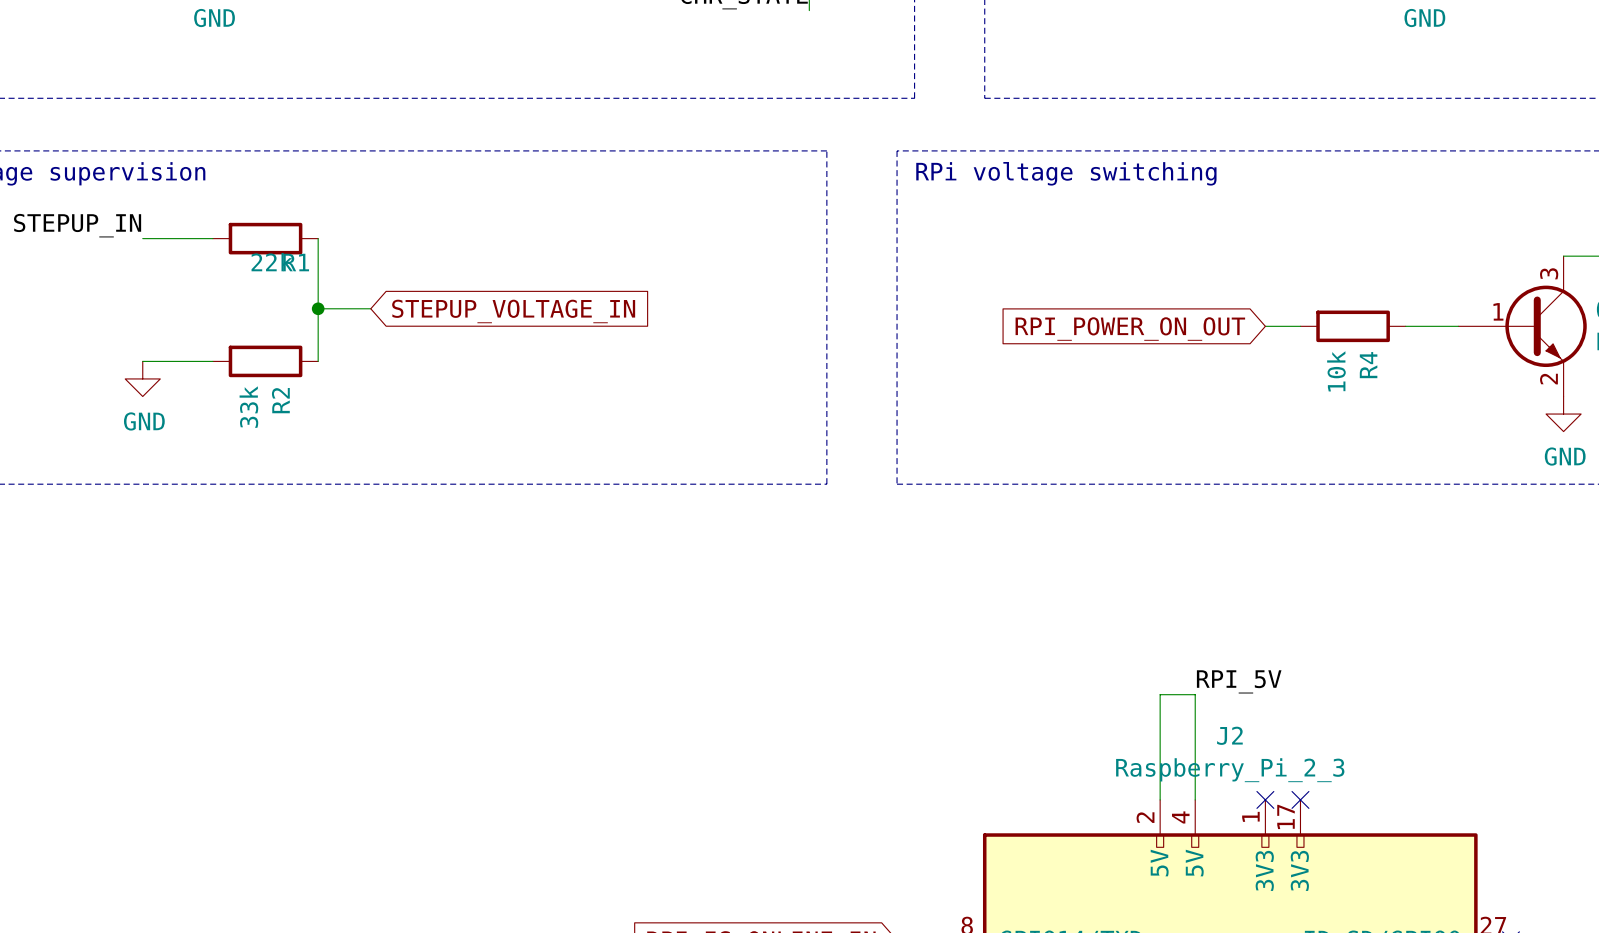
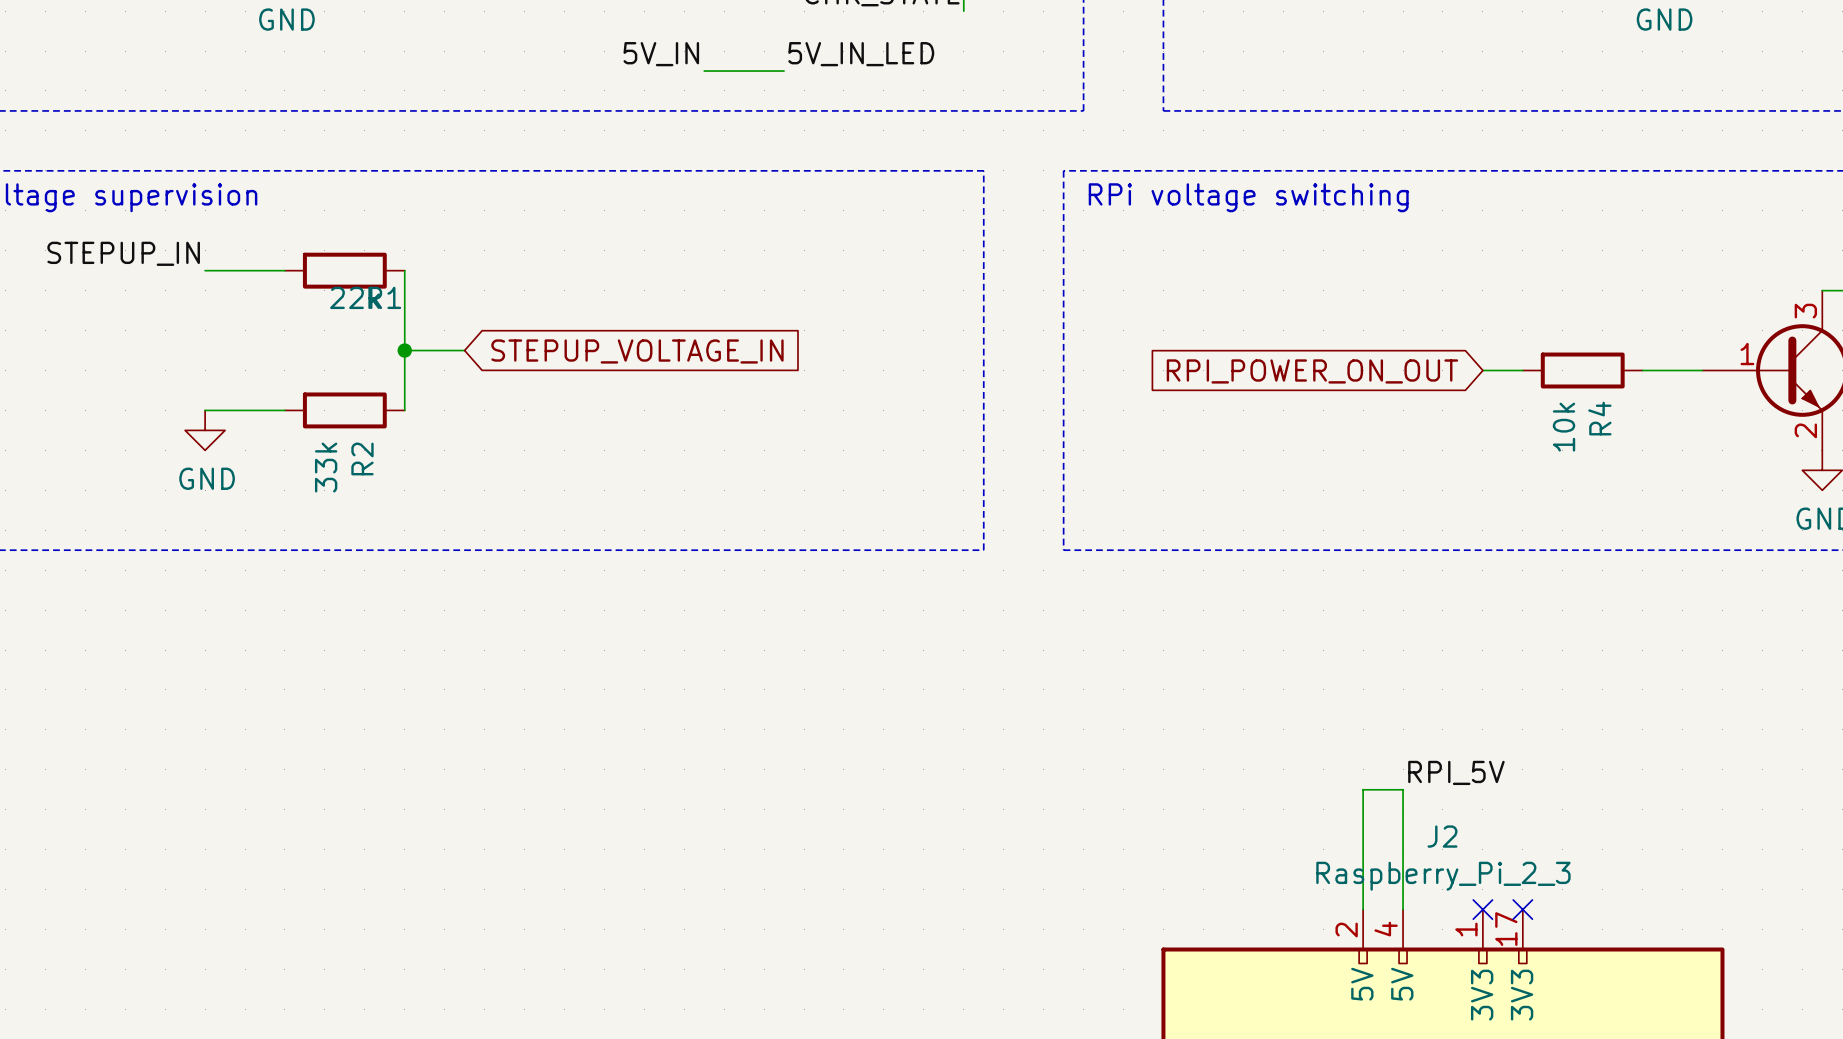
label: none -> 5V_IN (661, 54)
label: none -> 5V_IN_LED (861, 54)
wire: none -> (704, 71) (784, 71)

